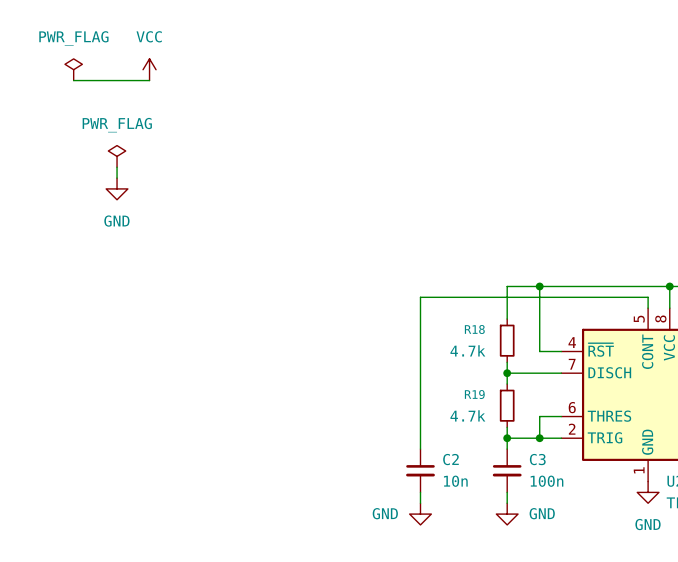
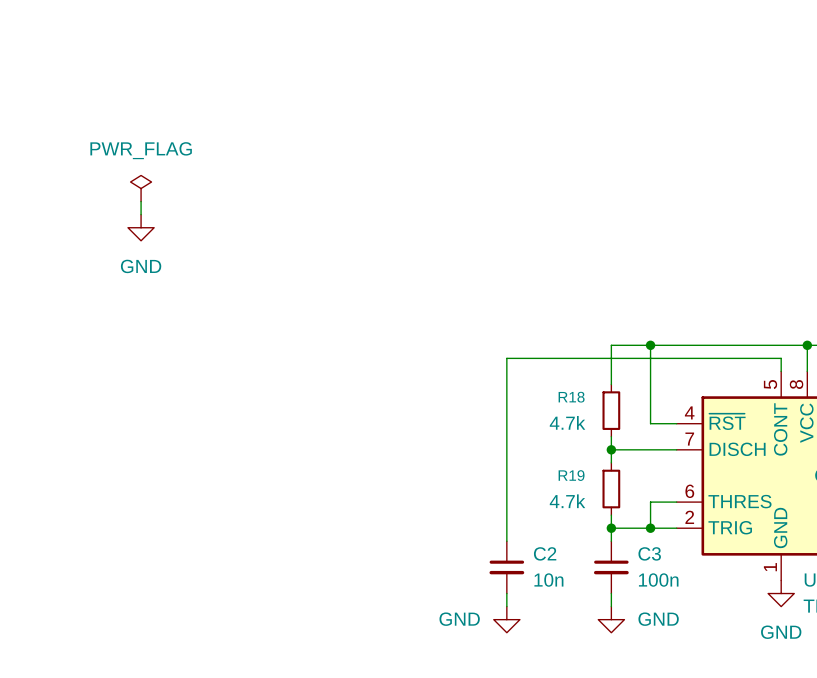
power symbol: PWR_FLAG (73, 69) -> none
power symbol: VCC (149, 69) -> none
wire: (73, 80) (149, 80) -> none

